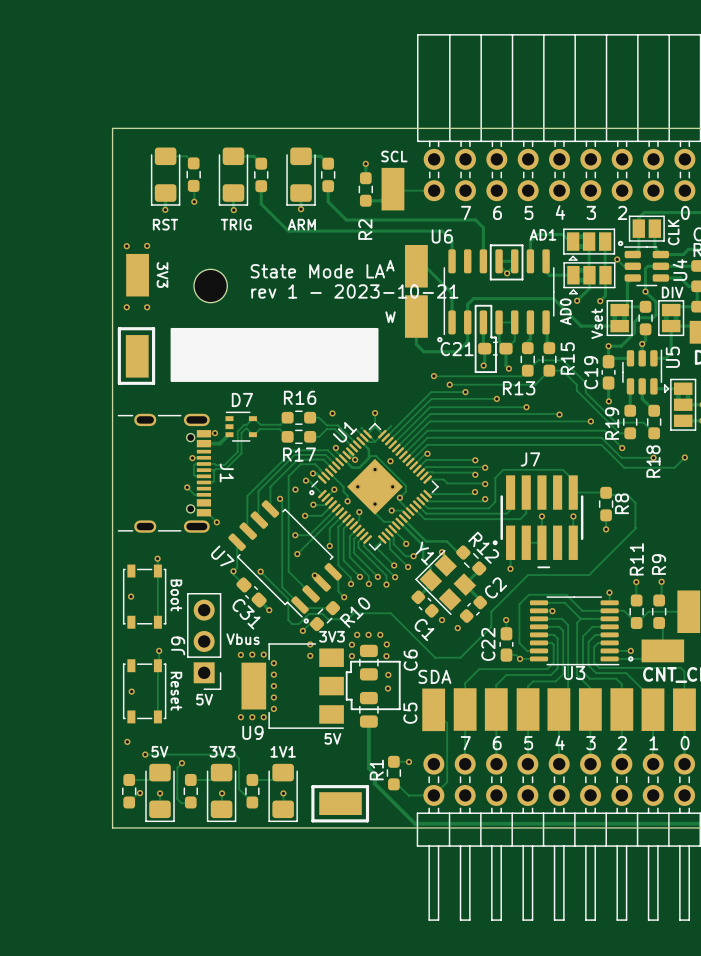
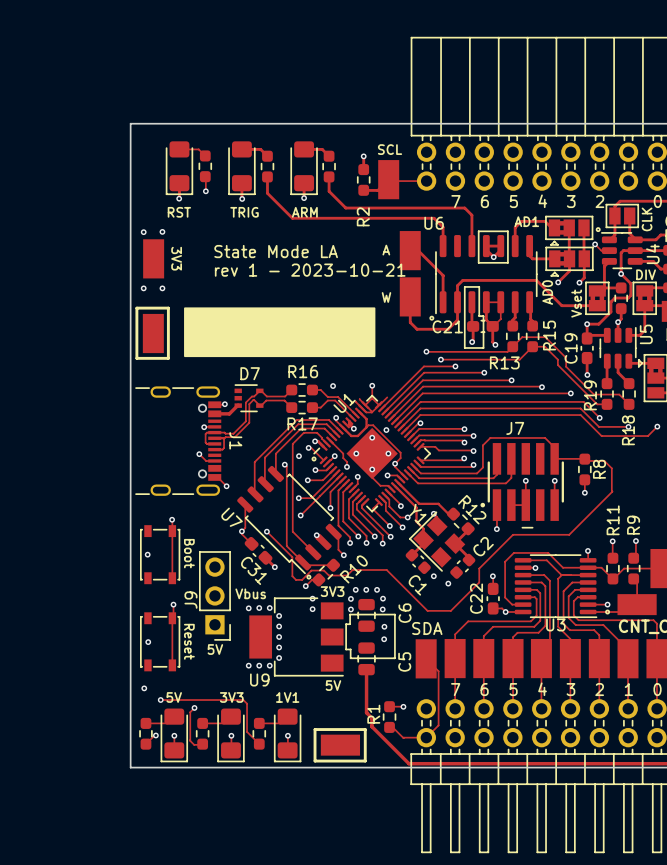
text position: State Mode LA (317, 271) -> State Mode LA (276, 251)
part: (210, 286) -> none
text position: rev 1 - 2023-10-21 (354, 291) -> rev 1 - 2023-10-21 (310, 270)

